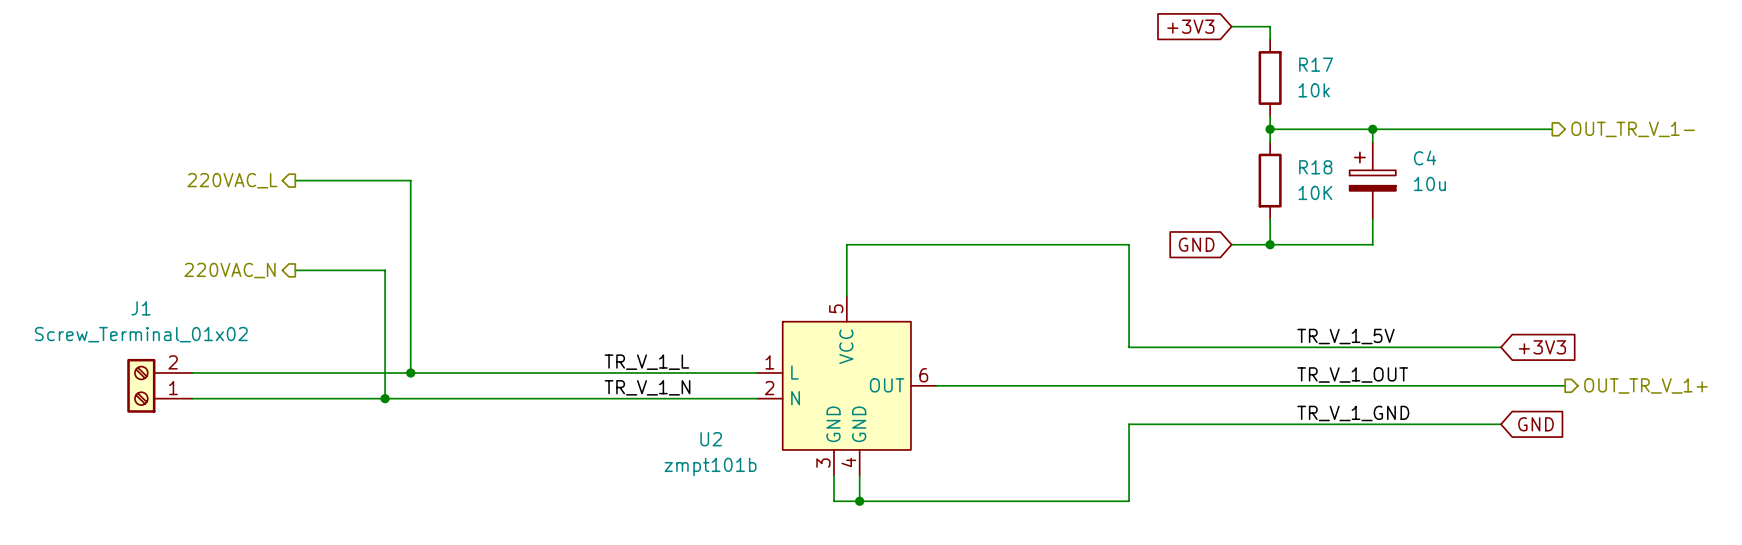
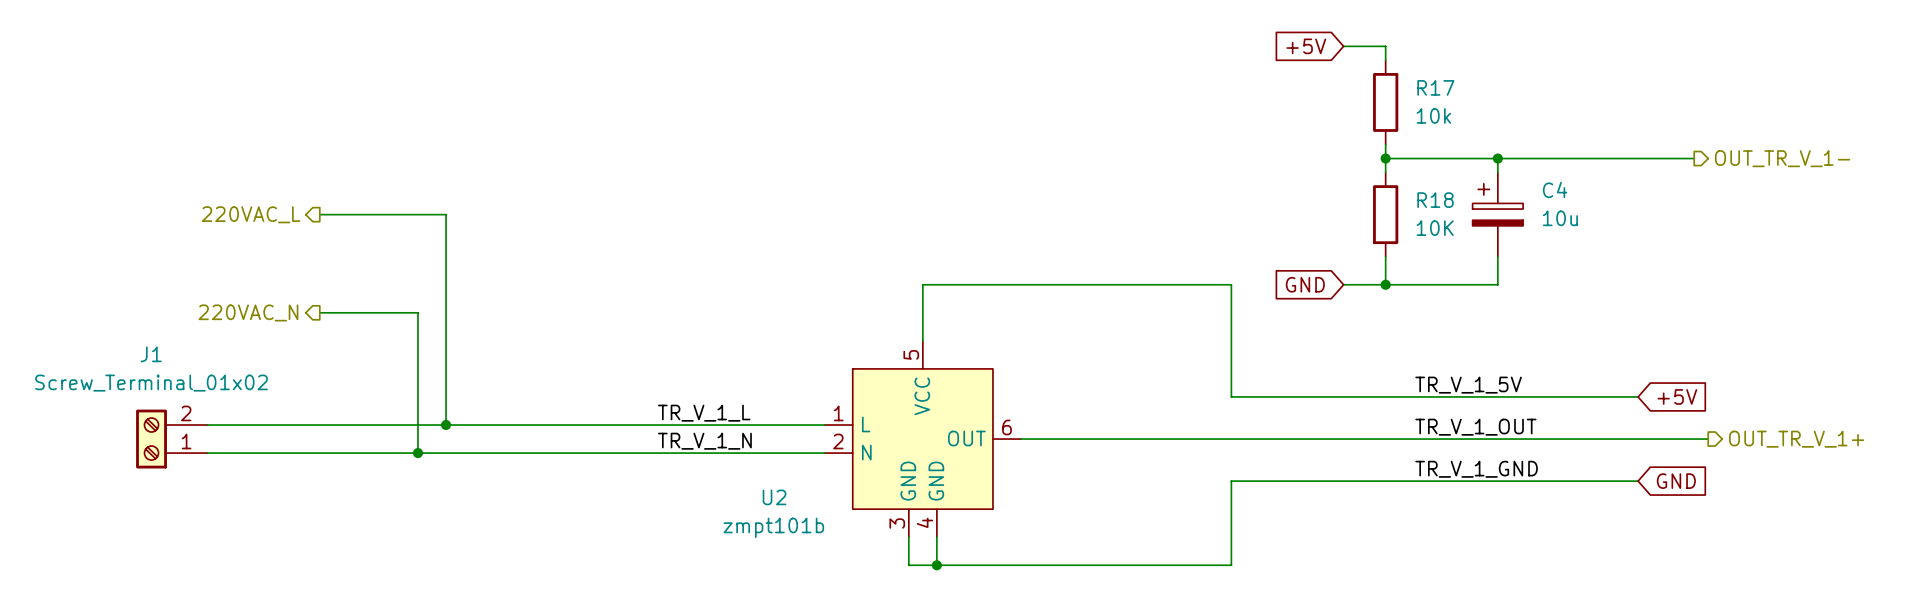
global label: +3V3 (1190, 26) -> +5V (1306, 46)
global label: +3V3 (1542, 347) -> +5V (1677, 396)

